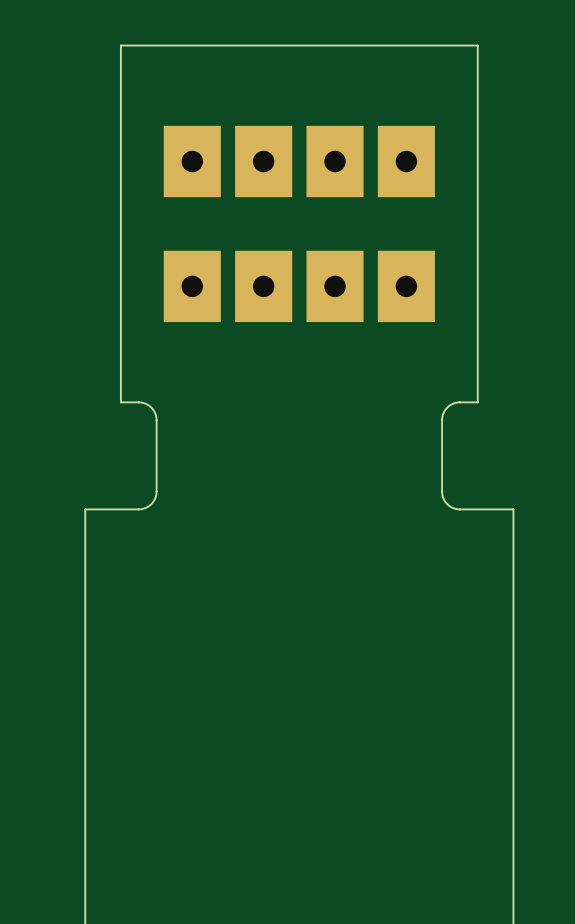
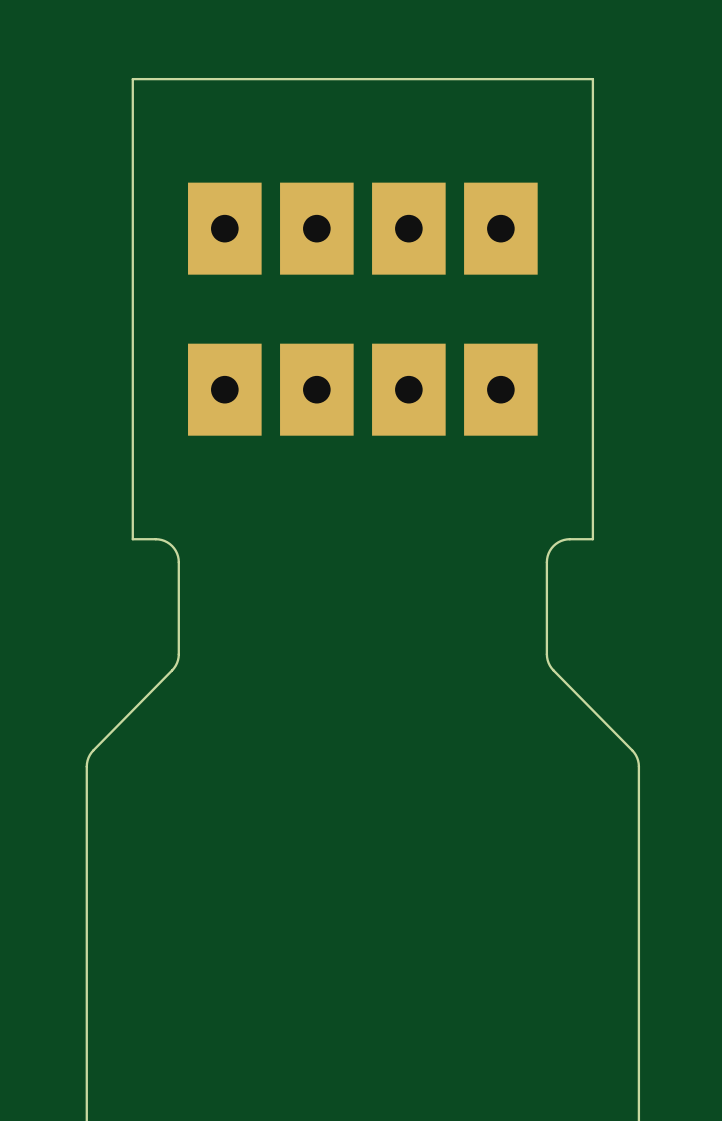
board edge: (156, 491) (152, 502) (143, 508) (85, 509) (85, 578) -> (178, 654) (174, 668) (93, 750) (88, 757) (86, 766)
board edge: (442, 491) (445, 502) (455, 508) (513, 509) (513, 578) -> (546, 654) (548, 663) (553, 670) (634, 752) (638, 766)

